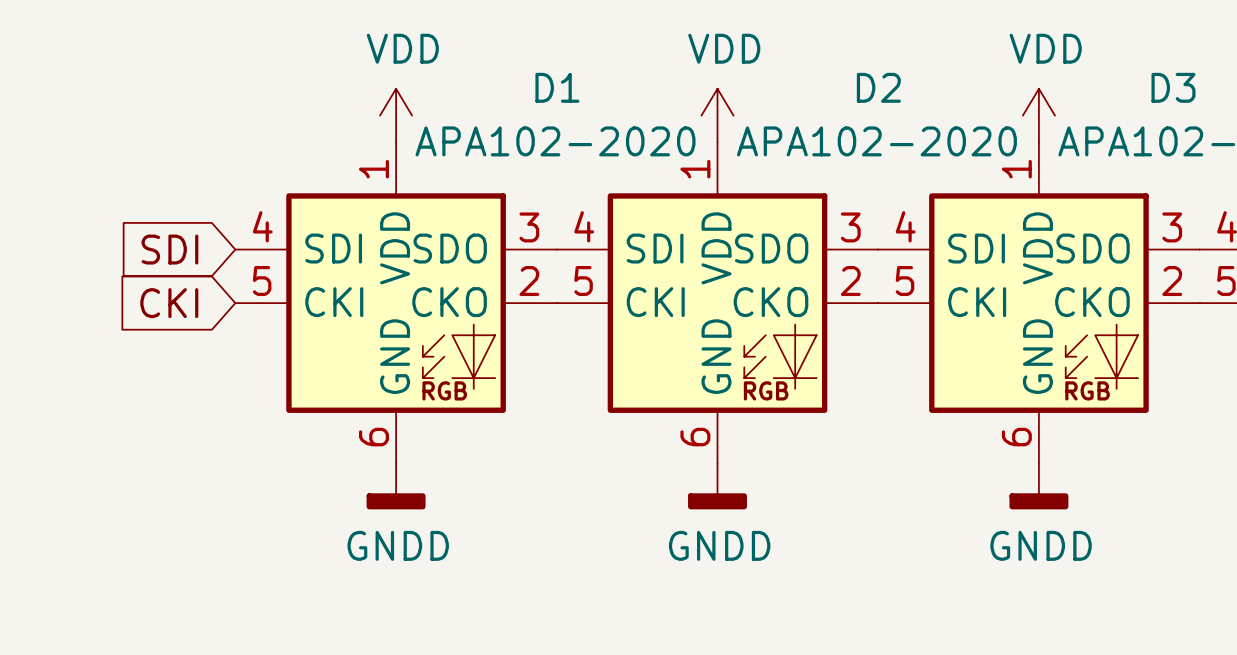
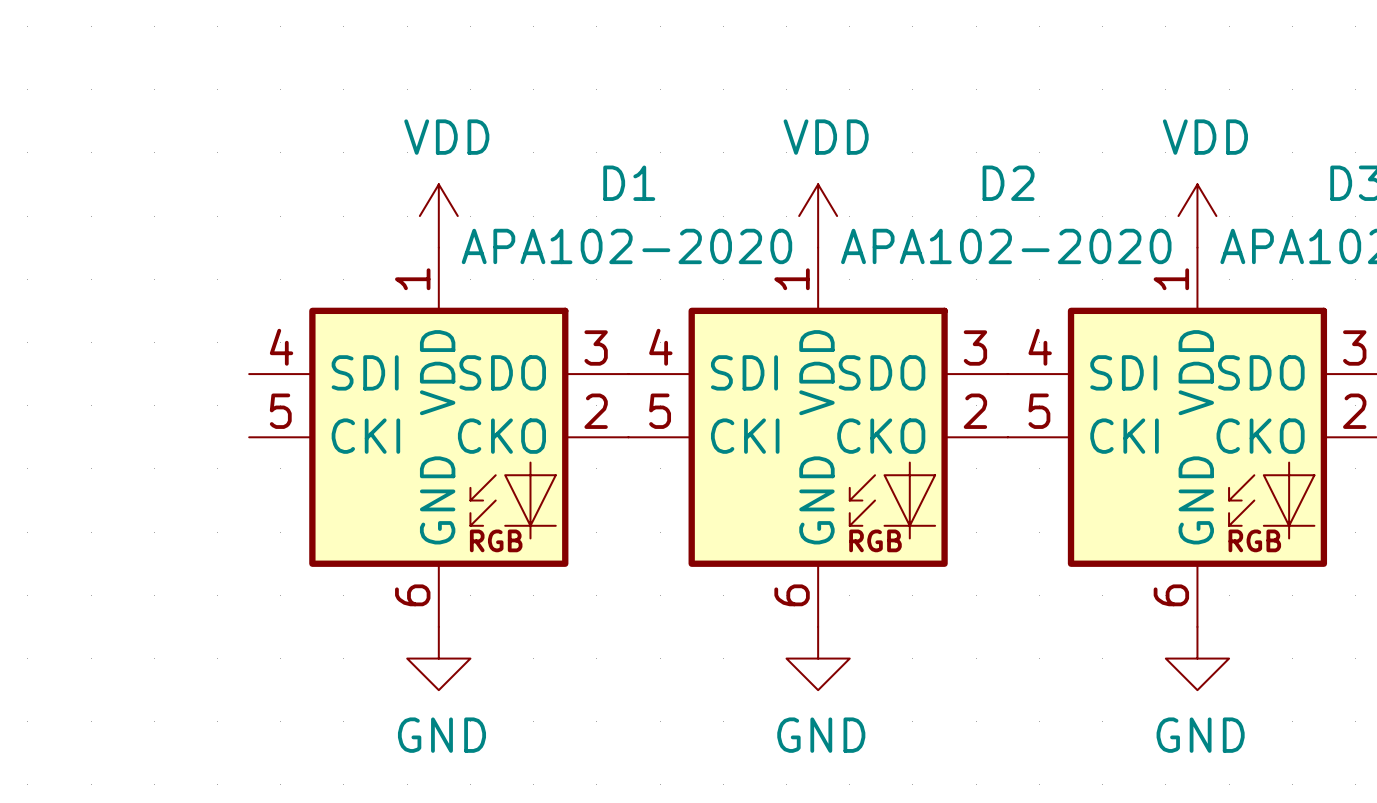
global label: SDI (169, 249) -> none
global label: CKI (169, 303) -> none
power symbol: GNDD (396, 486) -> GND (438, 658)
power symbol: GNDD (717, 486) -> GND (818, 658)
power symbol: GNDD (1038, 486) -> GND (1197, 658)

